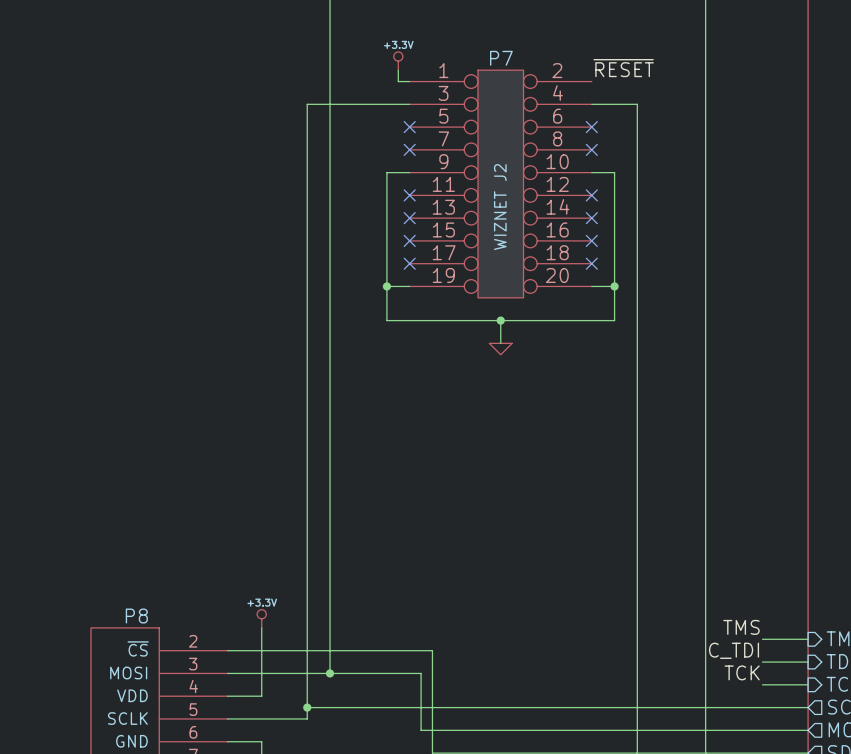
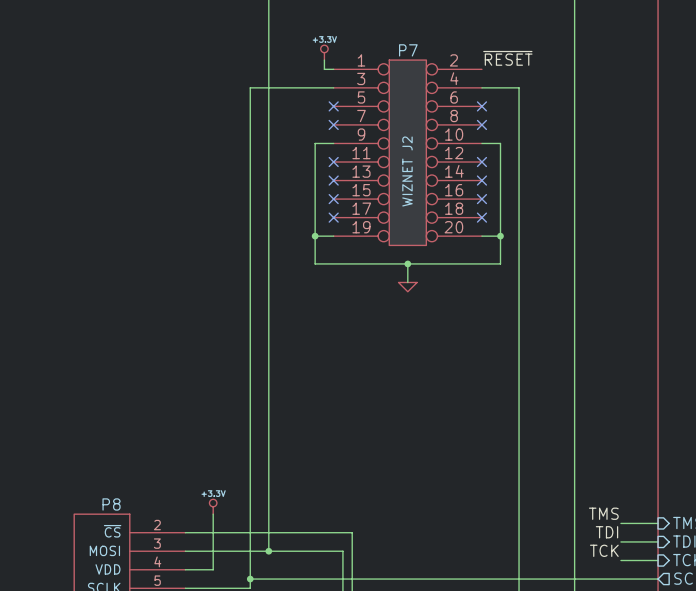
label: C_TDI (734, 650) -> TDI (606, 532)

